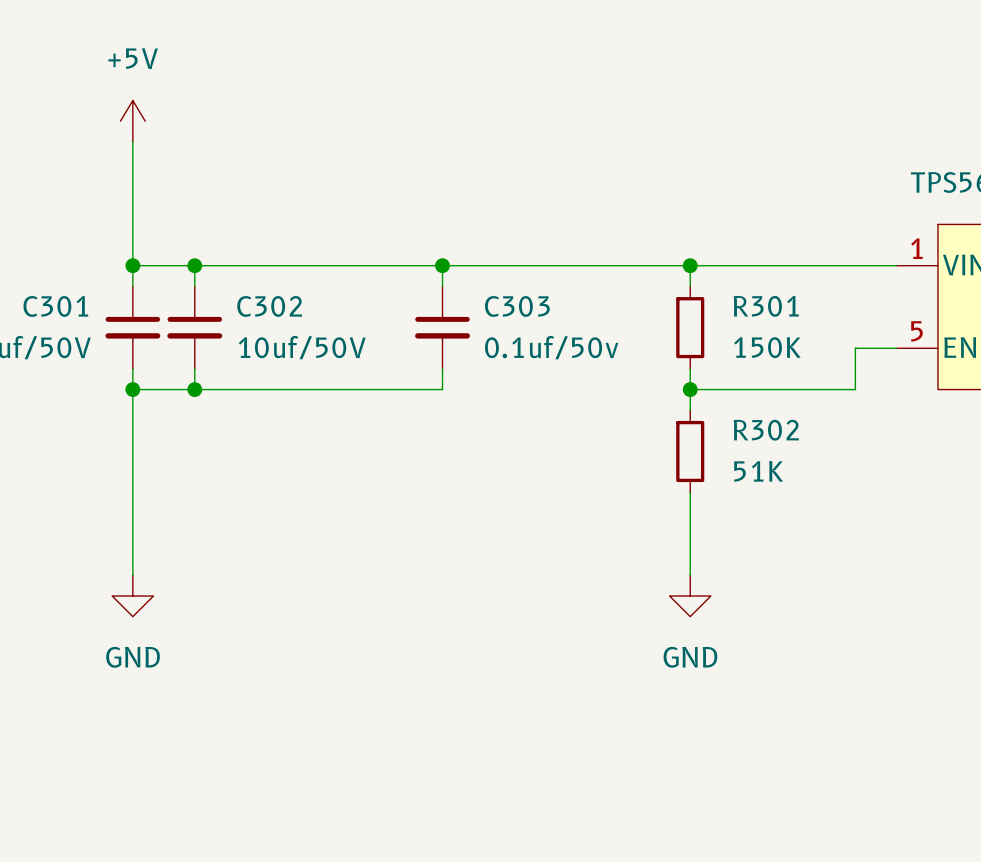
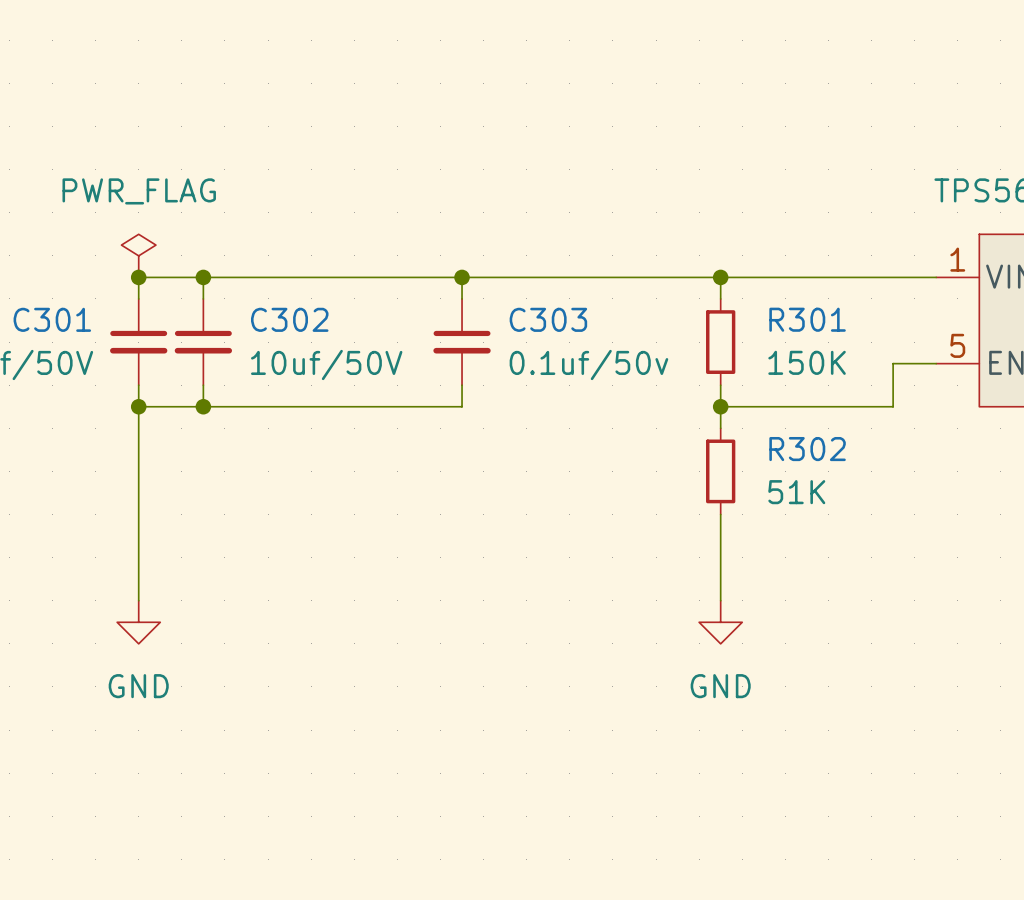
power symbol: +5V (132, 121) -> none
wire: (132, 141) (132, 265) -> none
power symbol: none -> PWR_FLAG (138, 255)

